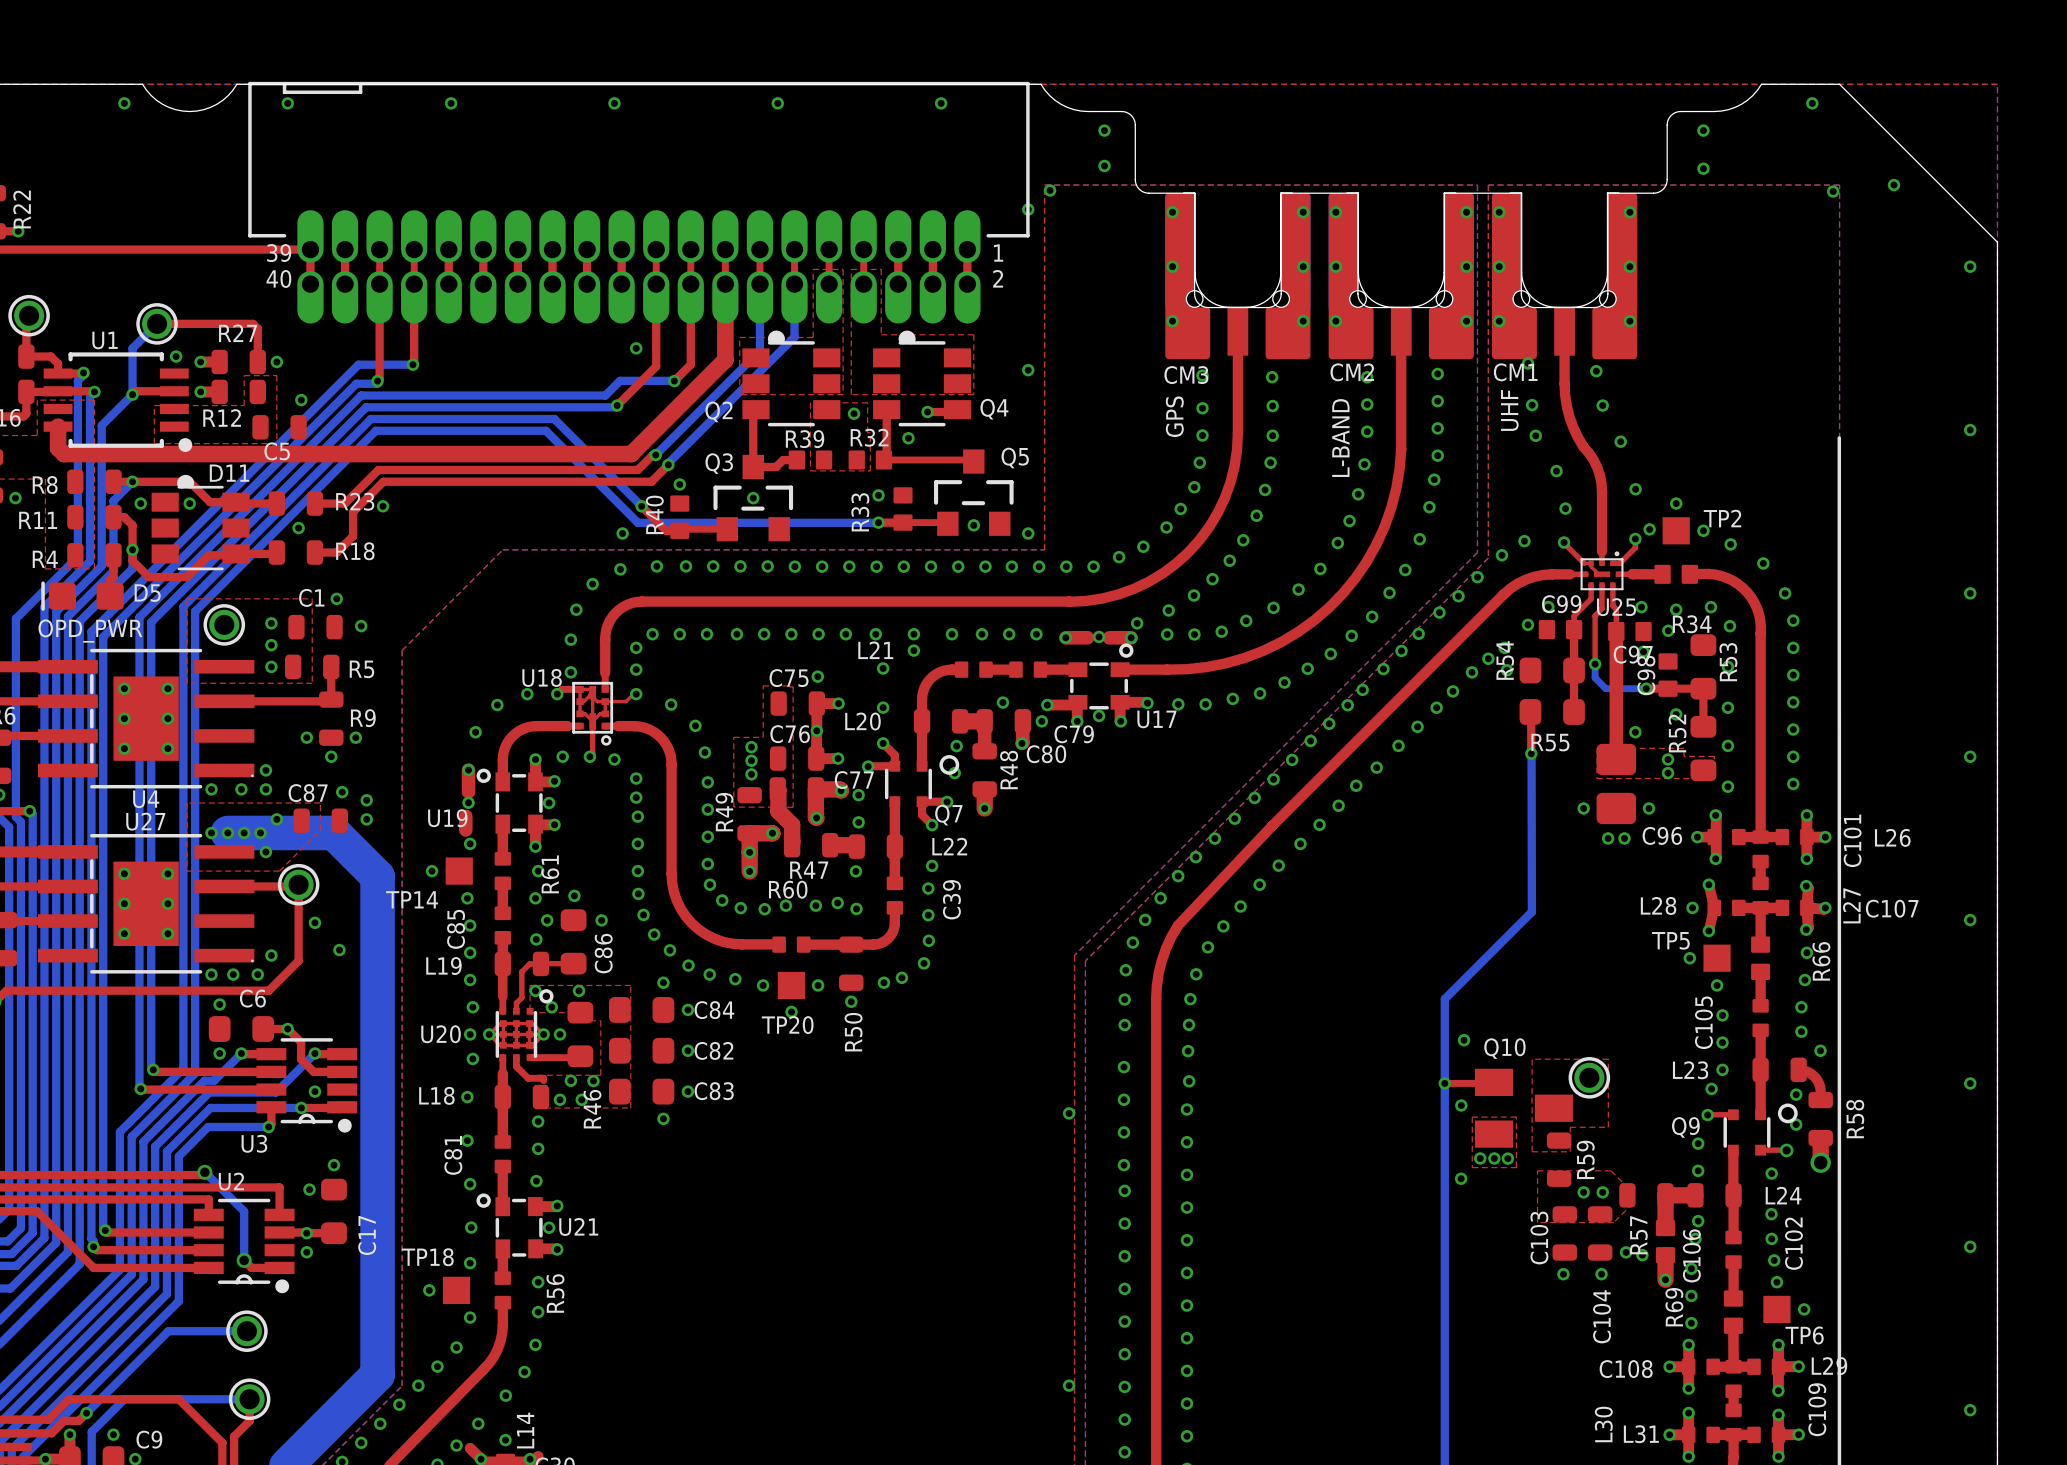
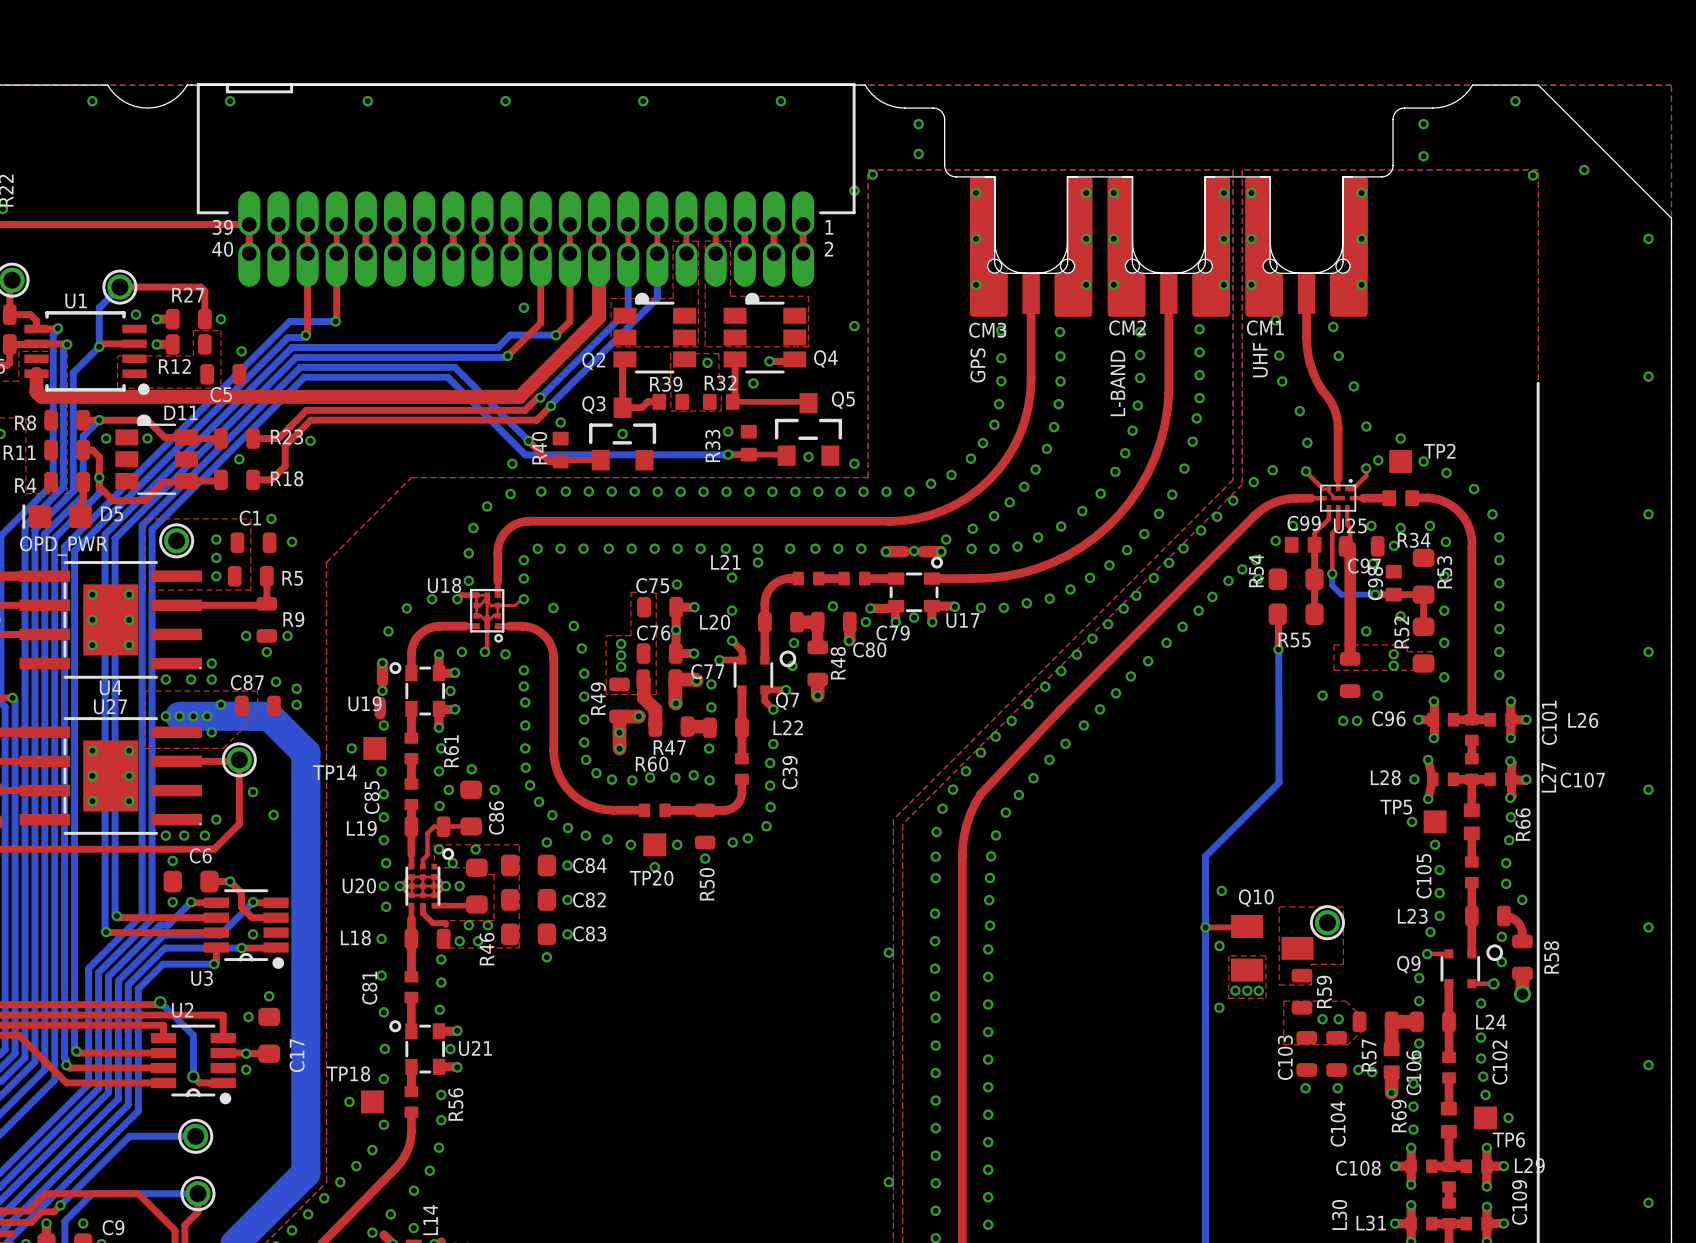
C97 footprint: [1608, 621, 1652, 642] -> [1338, 536, 1385, 557]
part footprint: [1596, 743, 1637, 825] -> [1339, 652, 1361, 698]

